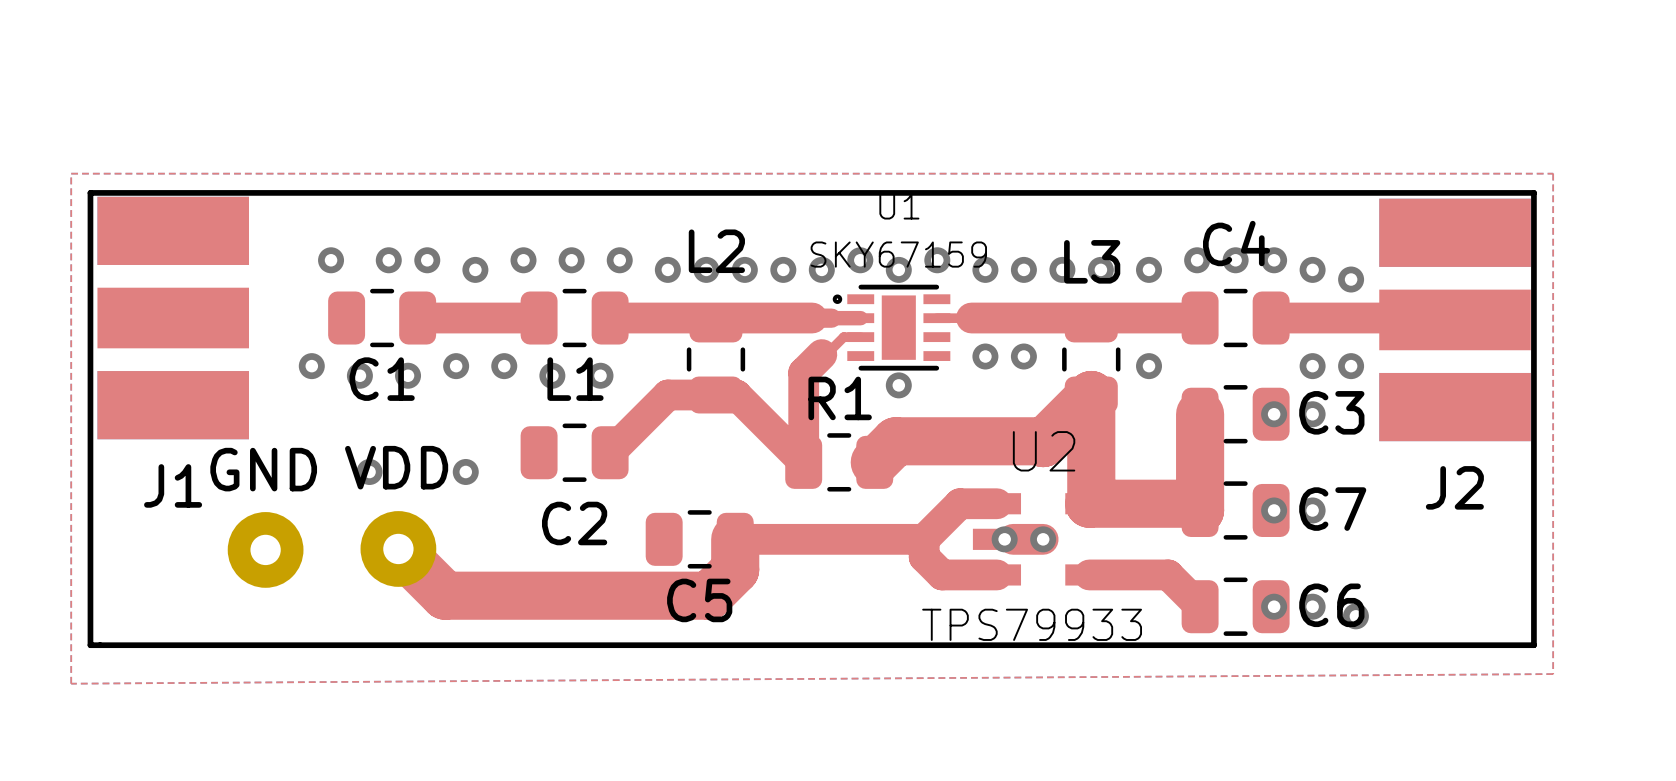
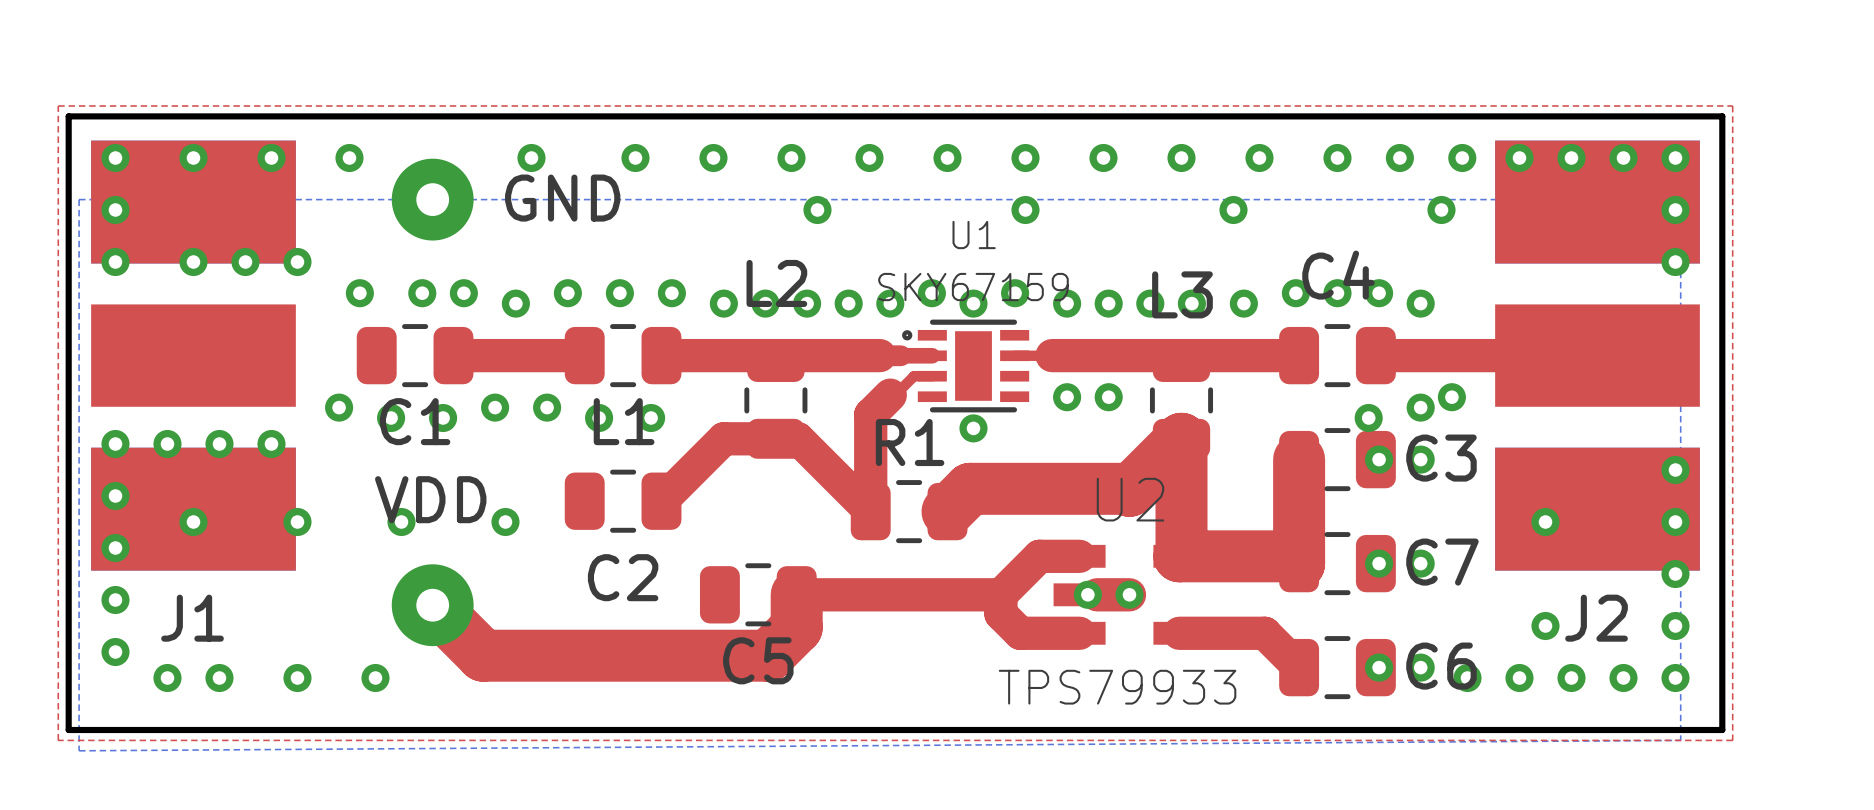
via: none -> (115, 158)
via: none -> (193, 158)
via: none -> (271, 158)
via: none -> (349, 158)
via: none -> (531, 158)
via: none -> (635, 158)
via: none -> (713, 158)
via: none -> (791, 158)
via: none -> (869, 158)
via: none -> (947, 158)
via: none -> (1025, 158)
via: none -> (1103, 158)
via: none -> (1181, 158)
via: none -> (1259, 158)
via: none -> (1337, 158)
via: none -> (1399, 158)
via: none -> (1462, 158)
via: none -> (1519, 158)
via: none -> (1571, 158)
via: none -> (1623, 158)
via: none -> (1675, 158)
top zone outline: (71, 173) (1553, 173) (1553, 674) (71, 683) (71, 173) -> (58, 106) (58, 740) (1732, 740) (1732, 106) (58, 106)
via: none -> (115, 210)
via: none -> (817, 210)
via: none -> (1025, 210)
via: none -> (1233, 210)
via: none -> (1441, 210)
via: none -> (1675, 210)
board edge: (90, 192) (90, 645) (1533, 645) (1533, 192) (90, 192) -> (68, 116) (68, 730) (1722, 730) (1722, 116) (68, 116)
J1 footprint: [97, 196, 249, 440] -> [91, 140, 296, 571]
J2 footprint: [1379, 198, 1531, 442] -> [1495, 140, 1700, 571]
via: none -> (115, 262)
via: none -> (193, 262)
via: none -> (245, 262)
via: none -> (297, 262)
via: none -> (1675, 262)
via: (1351, 279) -> none
via: (1149, 366) -> none
via position: (1351, 366) -> (1451, 397)
via: none -> (1368, 418)
via: none -> (115, 444)
via: none -> (167, 444)
via: none -> (219, 444)
via: none -> (271, 444)
via: none -> (1675, 470)
via: none -> (115, 496)
VDD name position: VDD (396, 467) -> VDD (430, 499)
GND name position: GND (263, 469) -> GND (562, 198)
via: none -> (193, 522)
via: none -> (297, 522)
via: none -> (1545, 522)
via: none -> (1675, 522)
via: none -> (115, 548)
via: none -> (1675, 574)
via: none -> (115, 600)
GND position: (265, 549) -> (432, 199)
via: none -> (1545, 626)
via: none -> (1675, 626)
via: none -> (115, 652)
via: none -> (167, 678)
via: none -> (219, 678)
via: none -> (297, 678)
via: none -> (375, 678)
via: none -> (1519, 678)
via: none -> (1571, 678)
via: none -> (1623, 678)
via: none -> (1675, 678)

